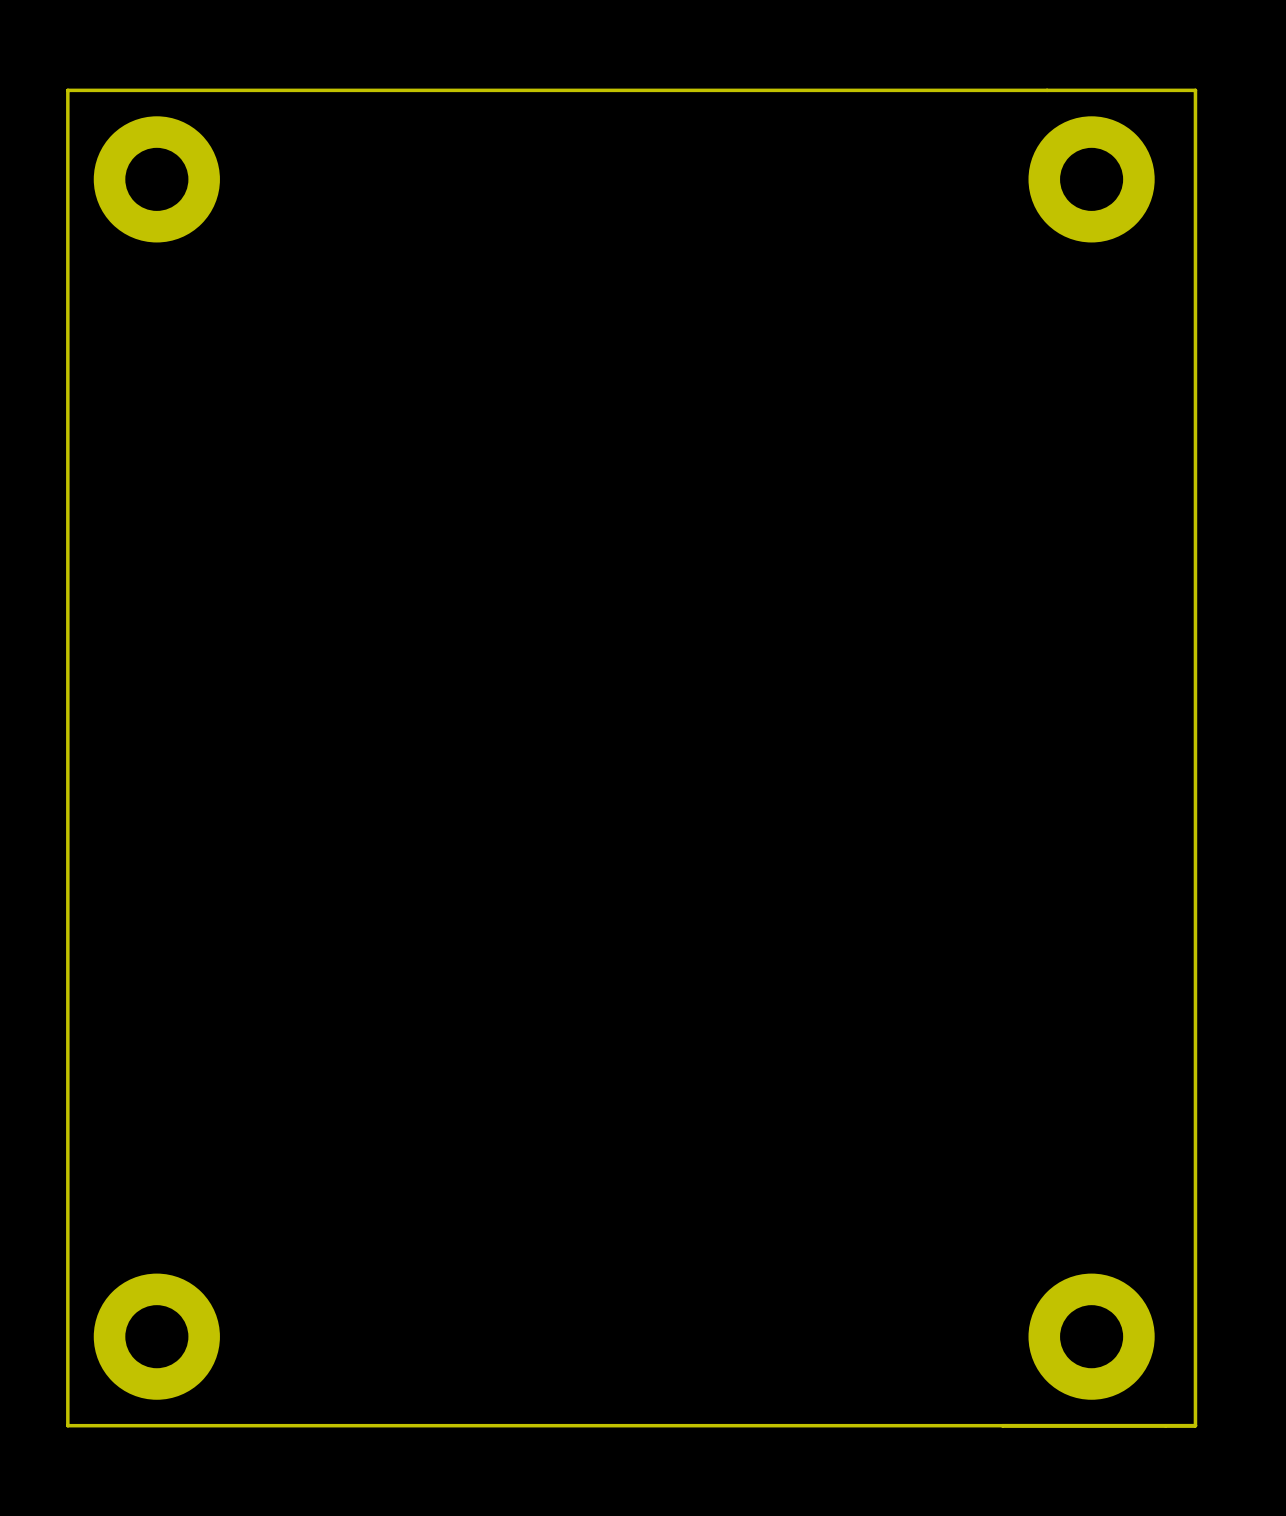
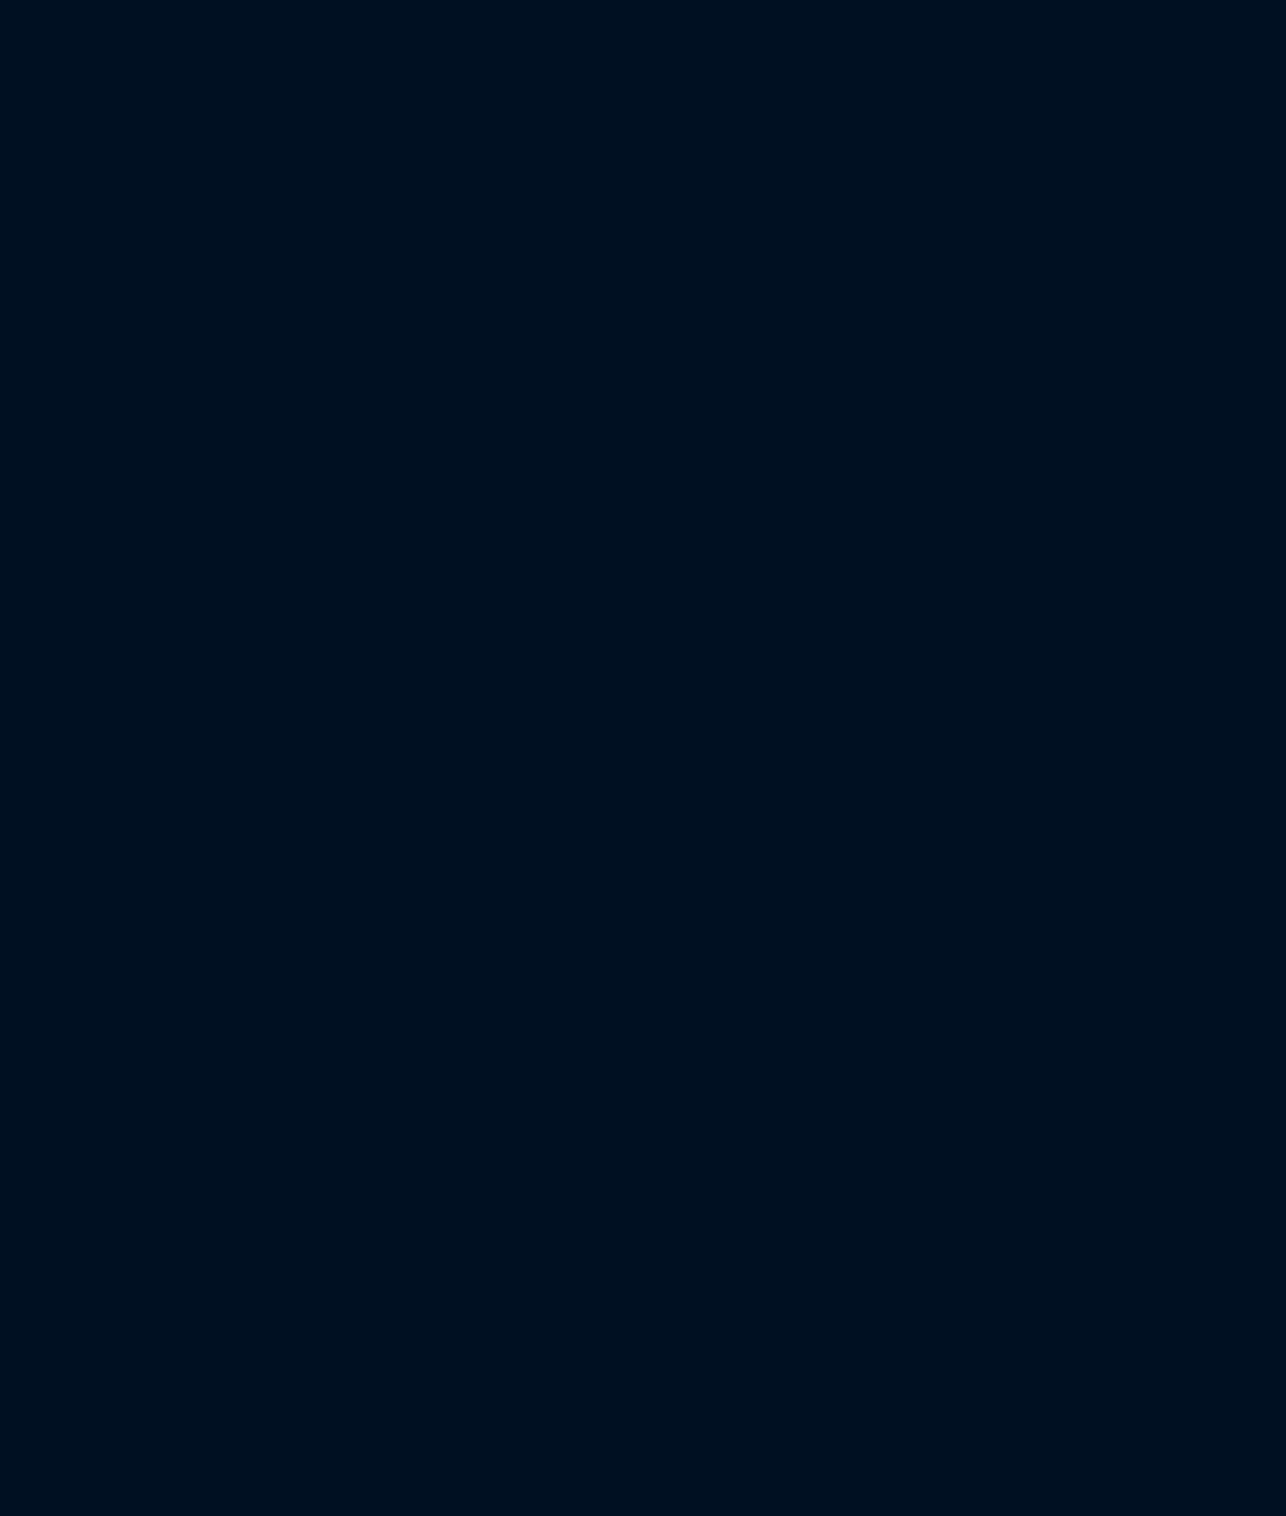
board edge: (67, 90) (1195, 90) (1195, 1425) (67, 1425) (67, 90) -> none
part: (156, 179) -> none
part: (1091, 179) -> none
part: (156, 1336) -> none
part: (1091, 1336) -> none

